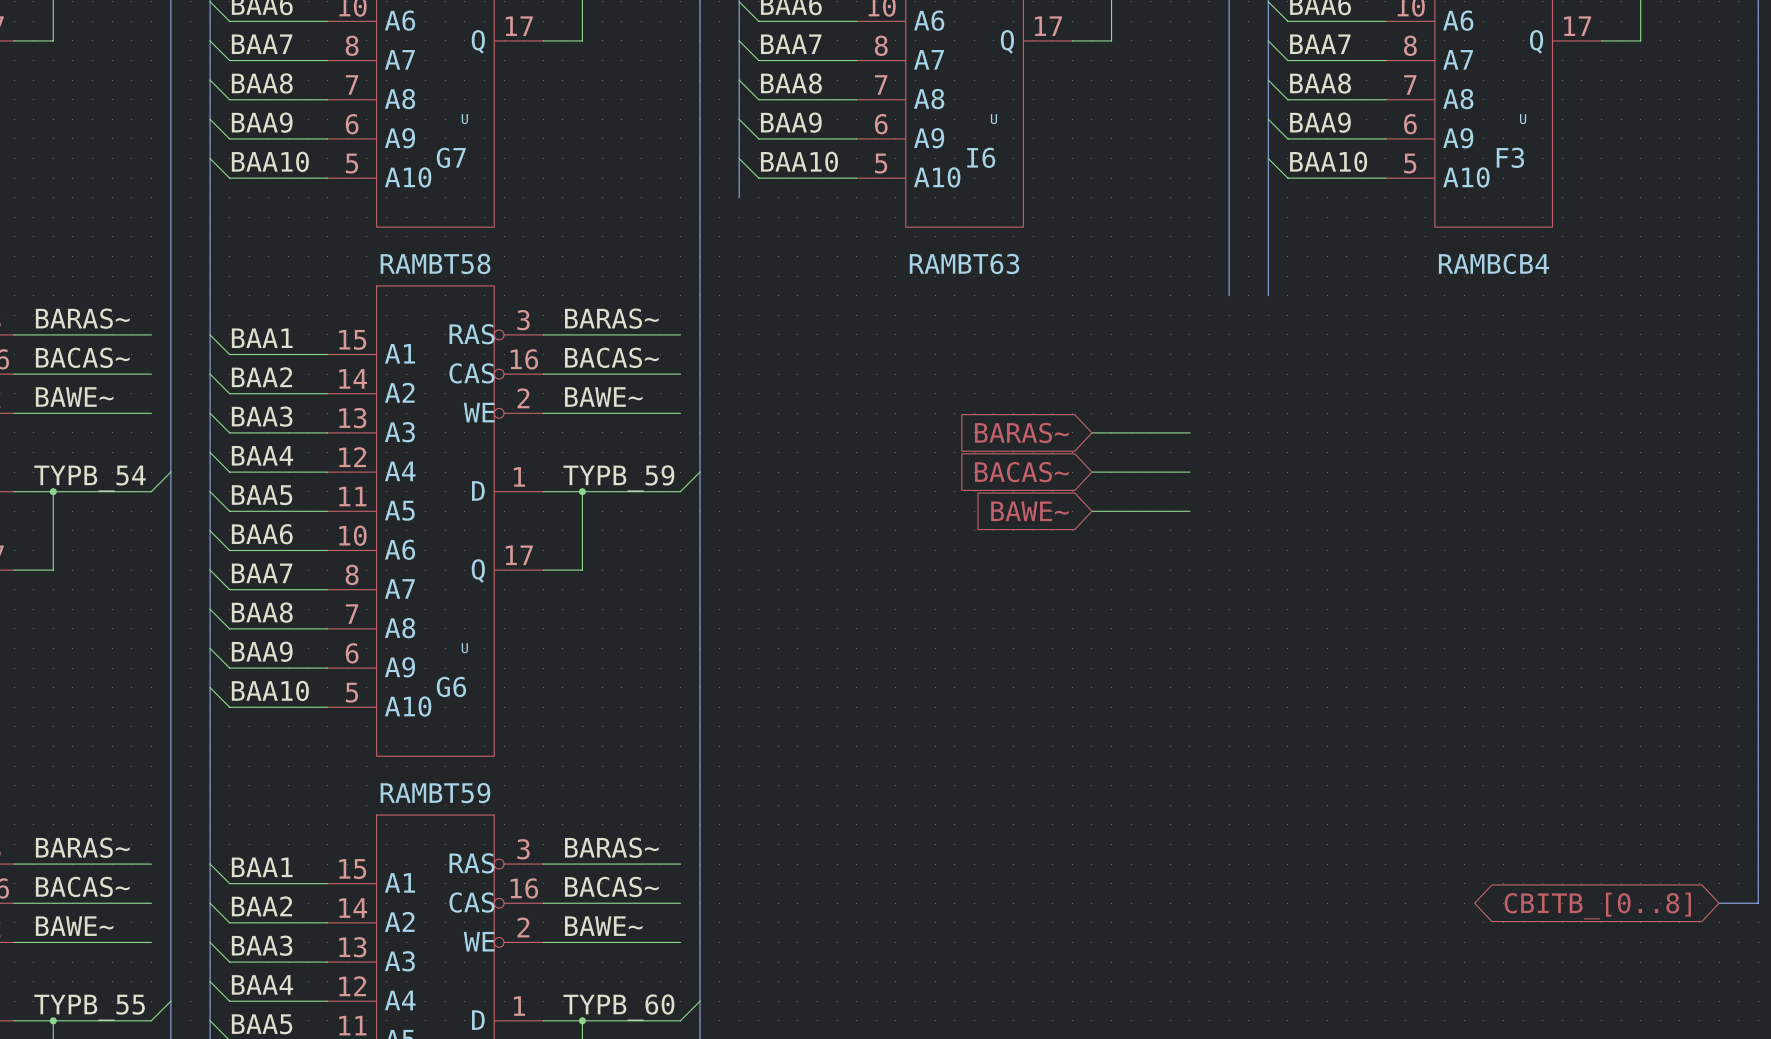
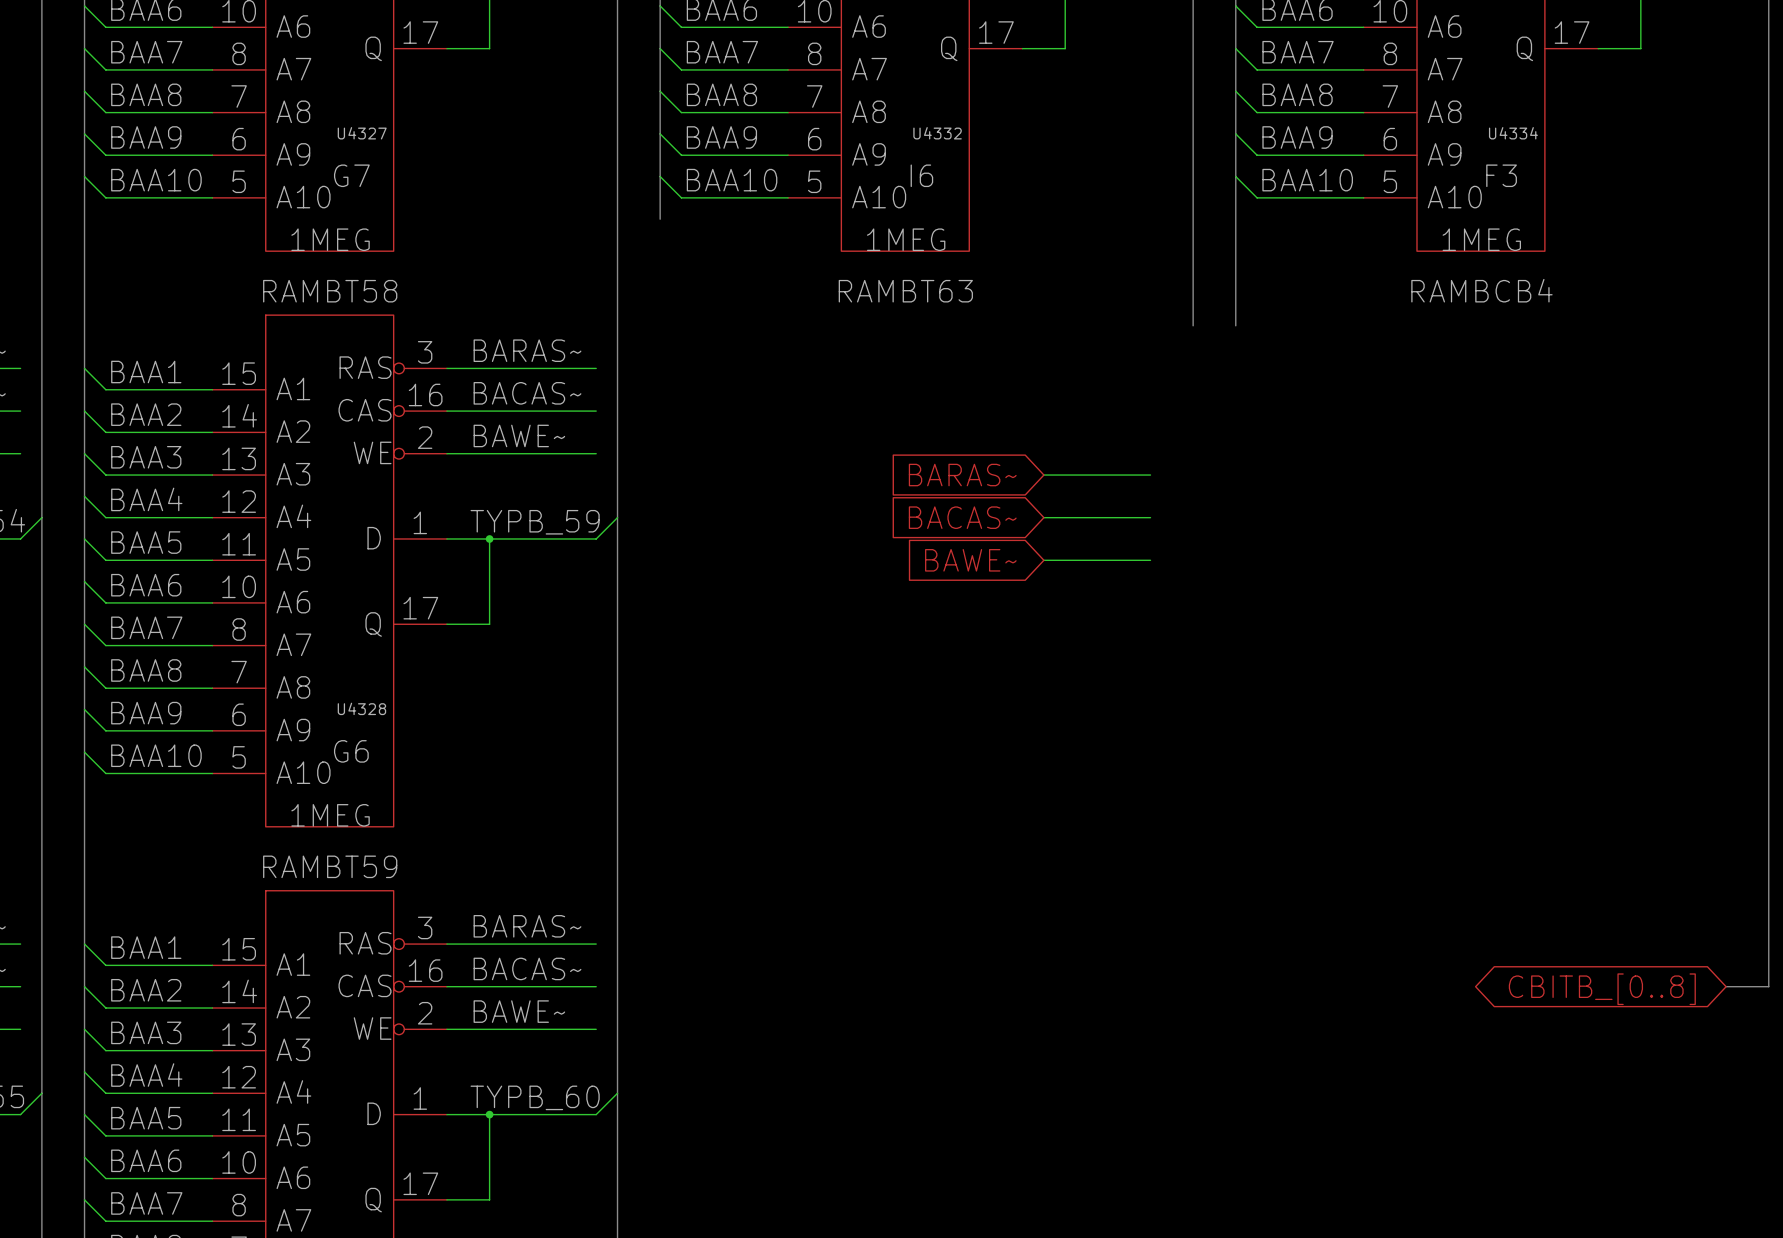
U name: U (464, 119) -> U4327 (362, 133)
U name: U (993, 119) -> U4332 (937, 133)
U name: U (1523, 119) -> U4334 (1513, 133)
U value: none -> 1MEG (330, 239)
U value: none -> 1MEG (906, 239)
U value: none -> 1MEG (1481, 239)
U name: U (464, 648) -> U4328 (361, 708)
U value: none -> 1MEG (330, 815)

